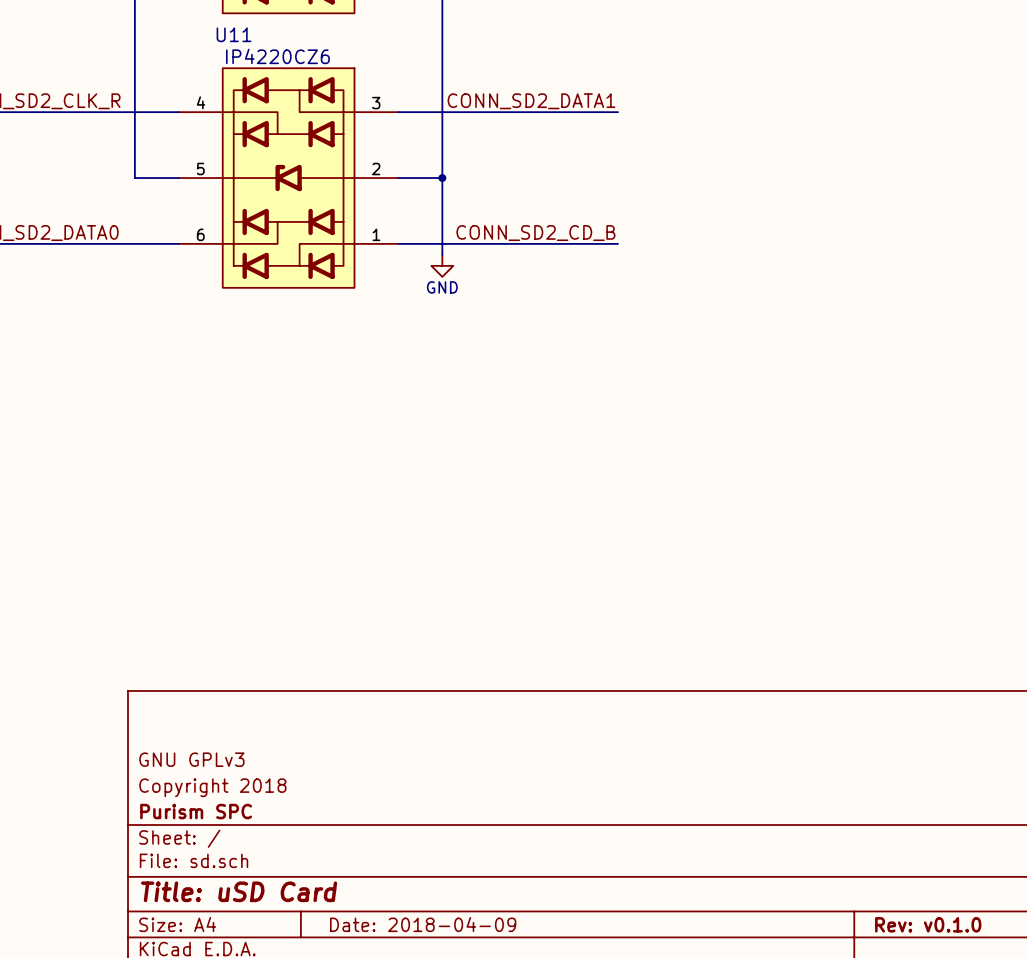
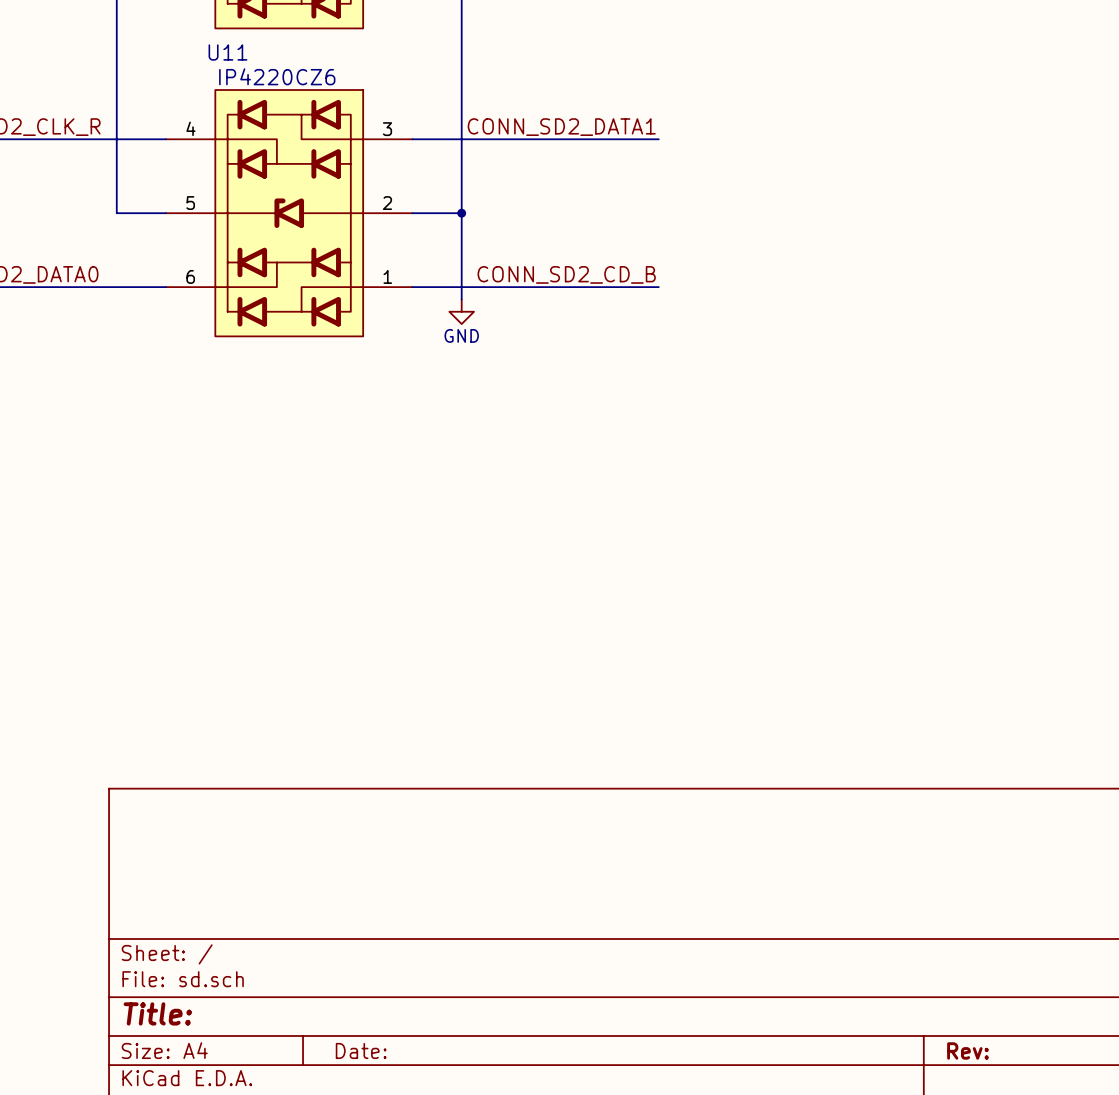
title block: GNU GPLv3 (191, 759) -> none
title block: Copyright 2018 (212, 787) -> none
title block: Purism SPC (196, 811) -> none
title block: Title: uSD Card (239, 891) -> Title: (157, 1013)
title block: Date: 2018-04-09 (423, 924) -> Date: (361, 1050)
title block: Rev: v0.1.0 (928, 924) -> Rev: (967, 1050)

